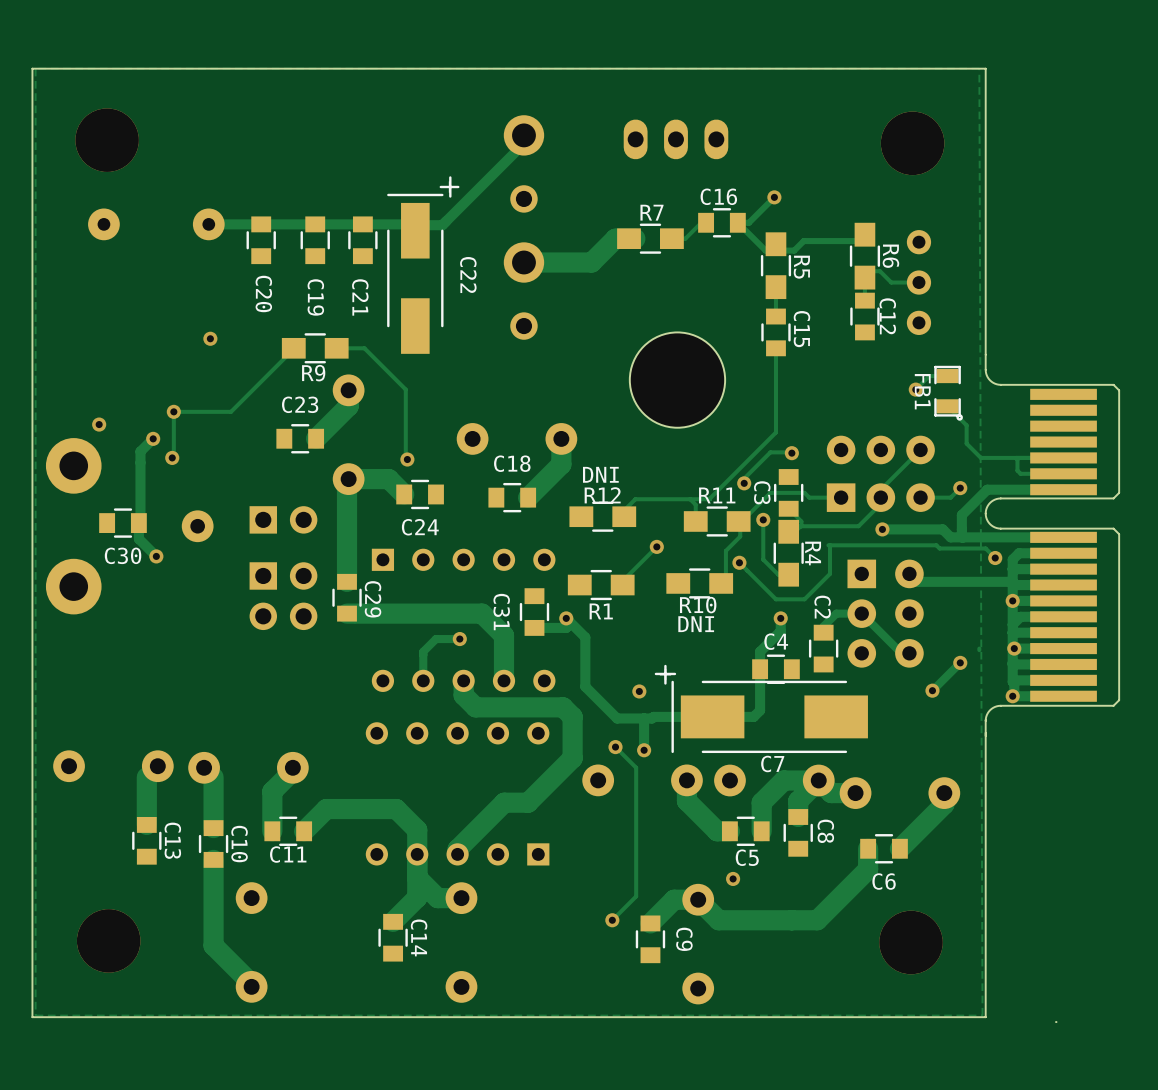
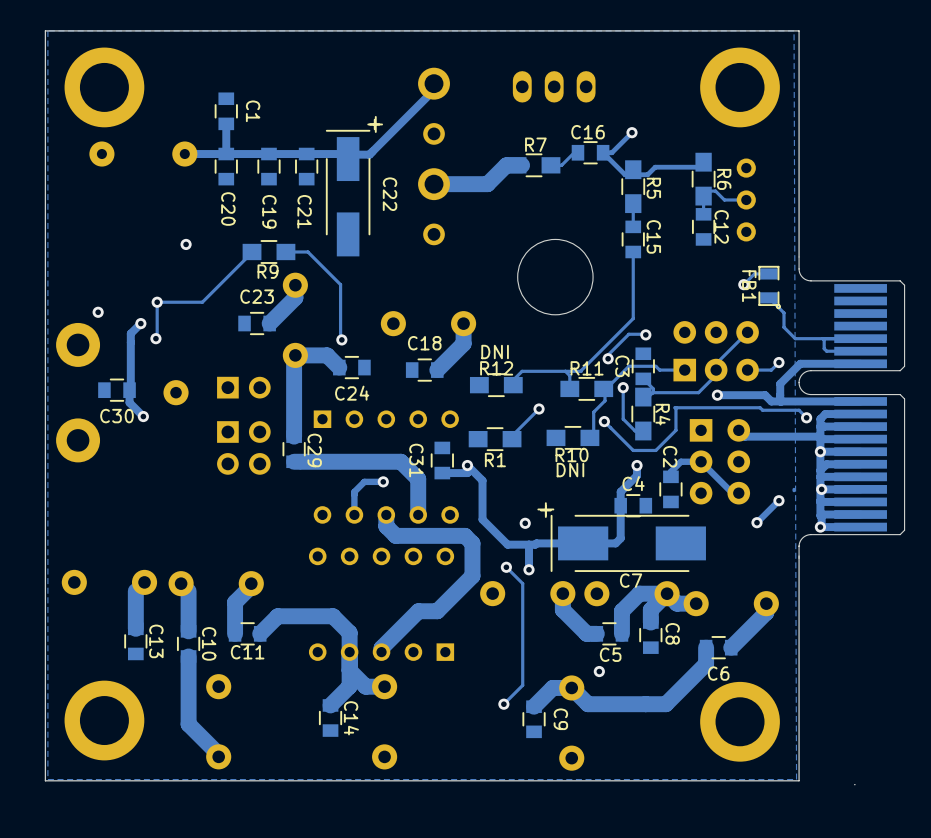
part footprint: [75, 108, 139, 172] -> [64, 47, 145, 128]
part footprint: [880, 111, 945, 176] -> [700, 47, 780, 128]
C1: none -> (226, 111)
track: none -> (226, 123) (226, 154)
part footprint: [76, 909, 141, 973] -> [64, 680, 145, 761]
part footprint: [879, 910, 943, 975] -> [700, 681, 780, 762]

